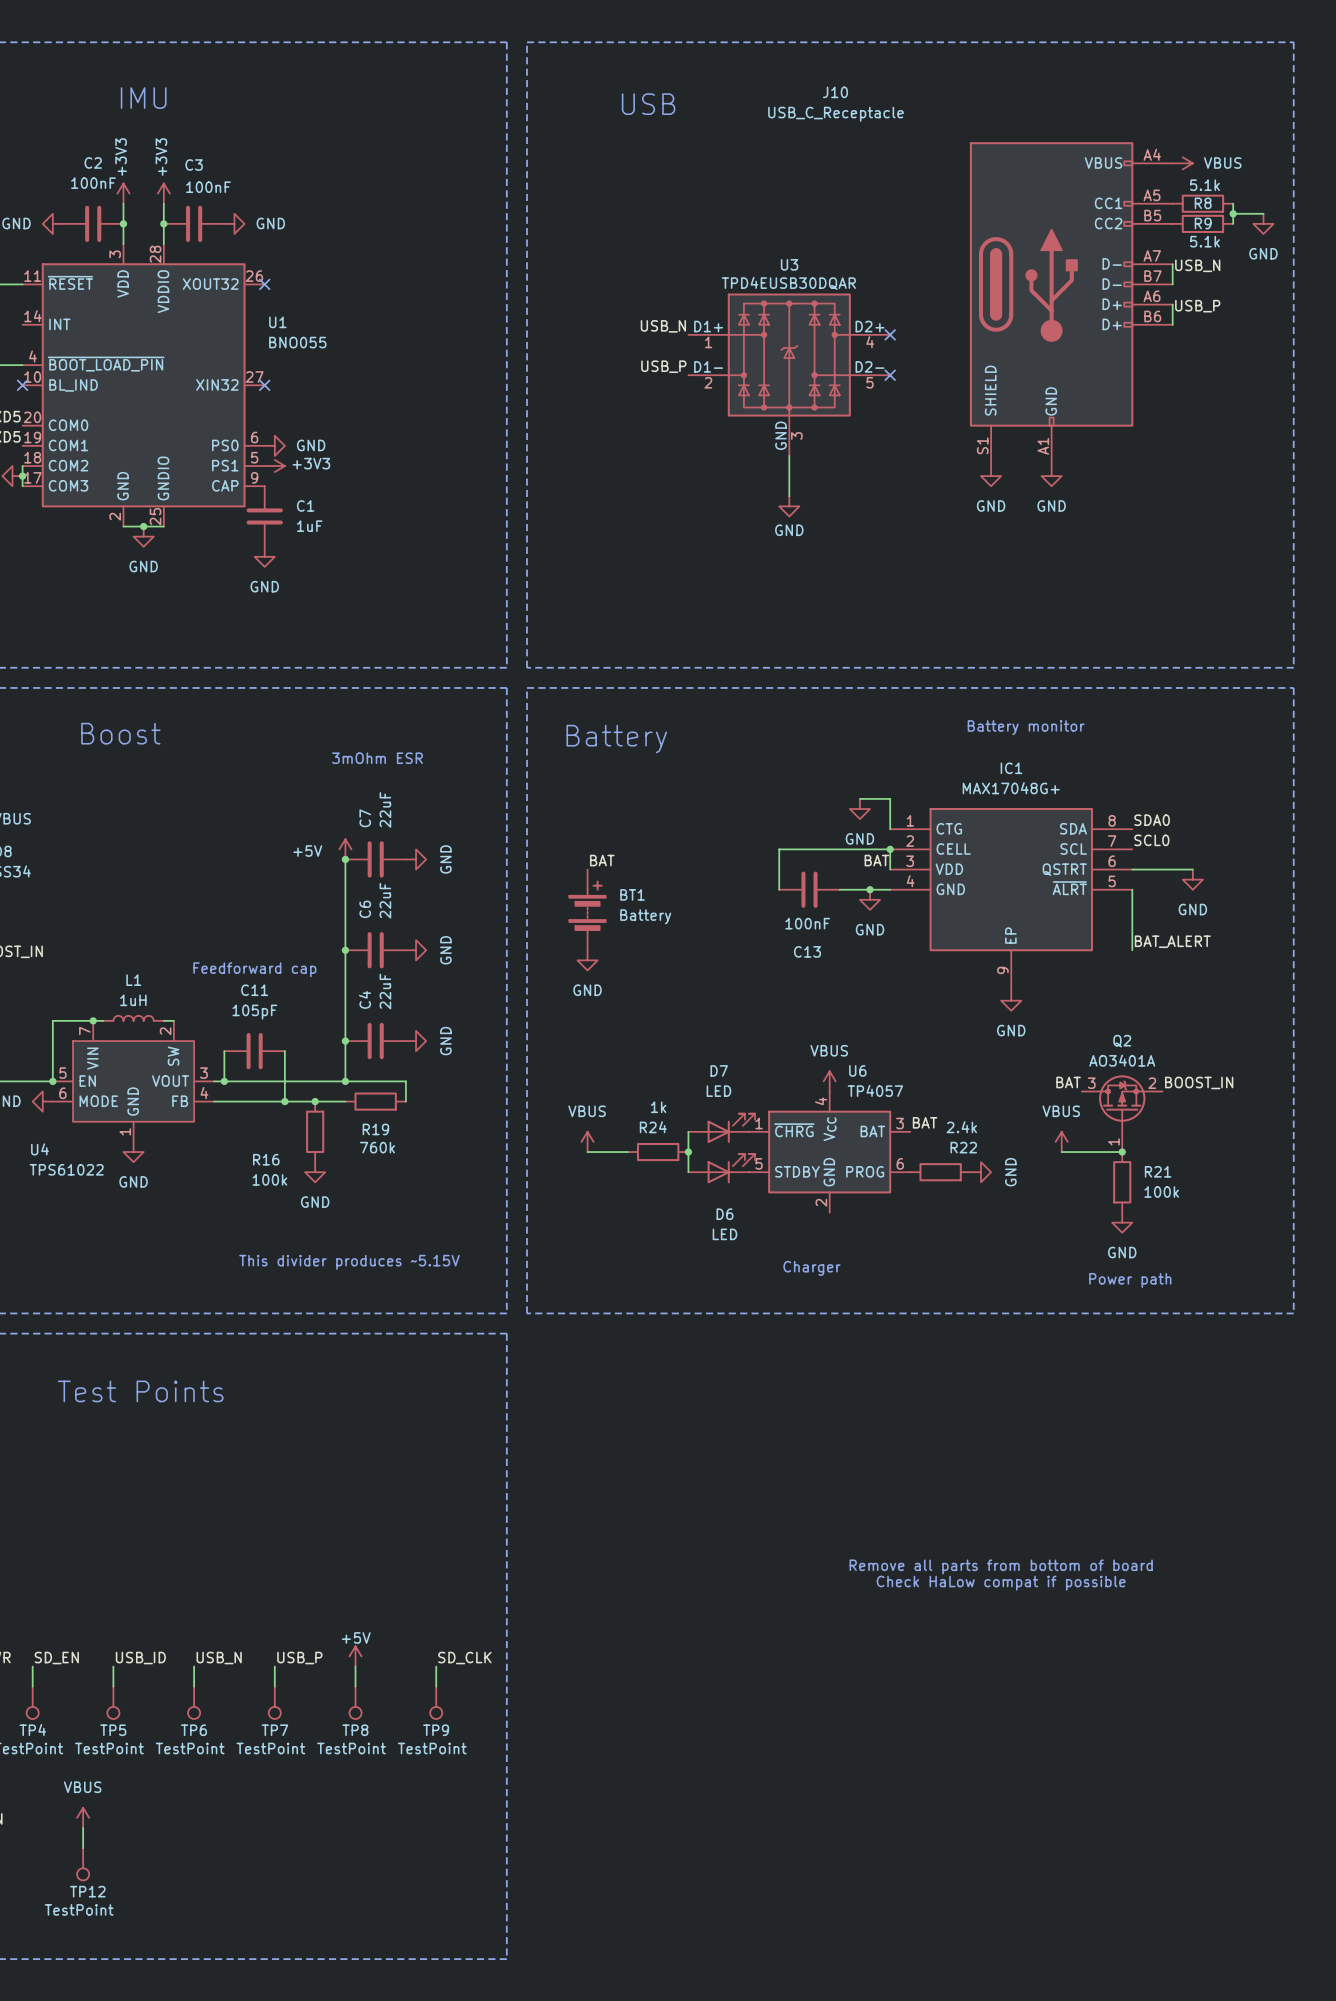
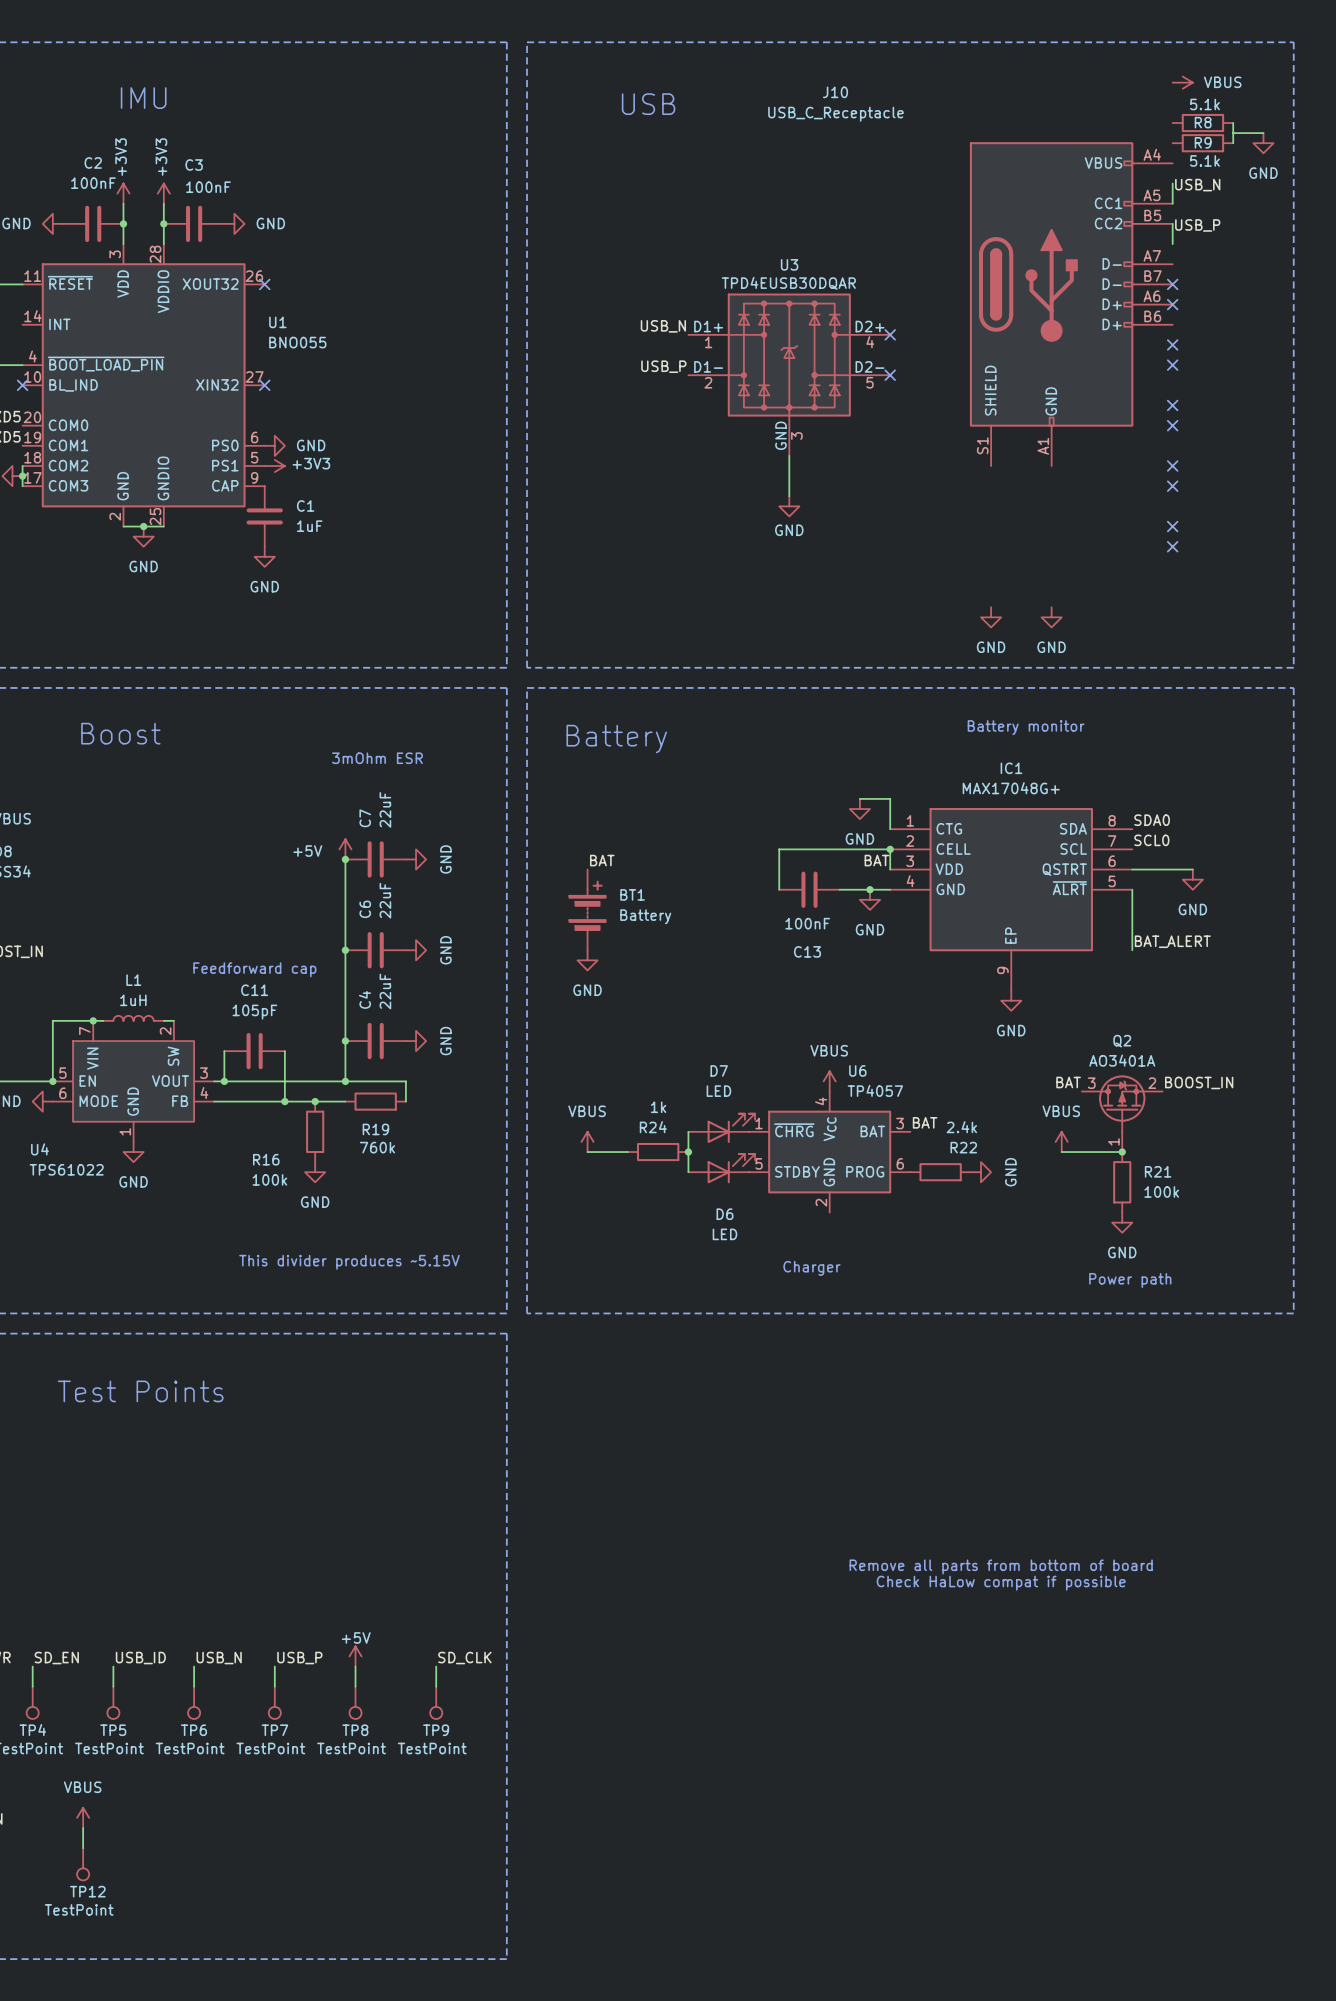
power symbol position: VBUS (1182, 163) -> VBUS (1182, 82)
R8 position: (1202, 203) -> (1202, 123)
wire: (1233, 203) (1233, 223) -> (1233, 123) (1233, 143)
wire: (1233, 213) (1263, 213) -> (1233, 133) (1263, 133)
junction: (1233, 213) -> none
R9 position: (1202, 223) -> (1202, 143)
power symbol position: GND (1263, 223) -> GND (1263, 143)
wire: (1172, 264) (1172, 284) -> (1172, 183) (1172, 203)
label position: USB_N (1197, 265) -> USB_N (1197, 185)
no-connect mark: none -> (1172, 284)
wire: (1172, 304) (1172, 324) -> (1172, 223) (1172, 244)
no-connect mark: none -> (1172, 304)
label position: USB_P (1197, 306) -> USB_P (1197, 225)
no-connect mark: none -> (1172, 344)
no-connect mark: none -> (1172, 365)
no-connect mark: none -> (1172, 405)
no-connect mark: none -> (1172, 425)
no-connect mark: none -> (1172, 466)
power symbol: GND (991, 476) -> none
power symbol: GND (1051, 476) -> none
no-connect mark: none -> (1172, 486)
no-connect mark: none -> (1172, 526)
no-connect mark: none -> (1172, 546)
power symbol: none -> GND (991, 617)
power symbol: none -> GND (1051, 617)

